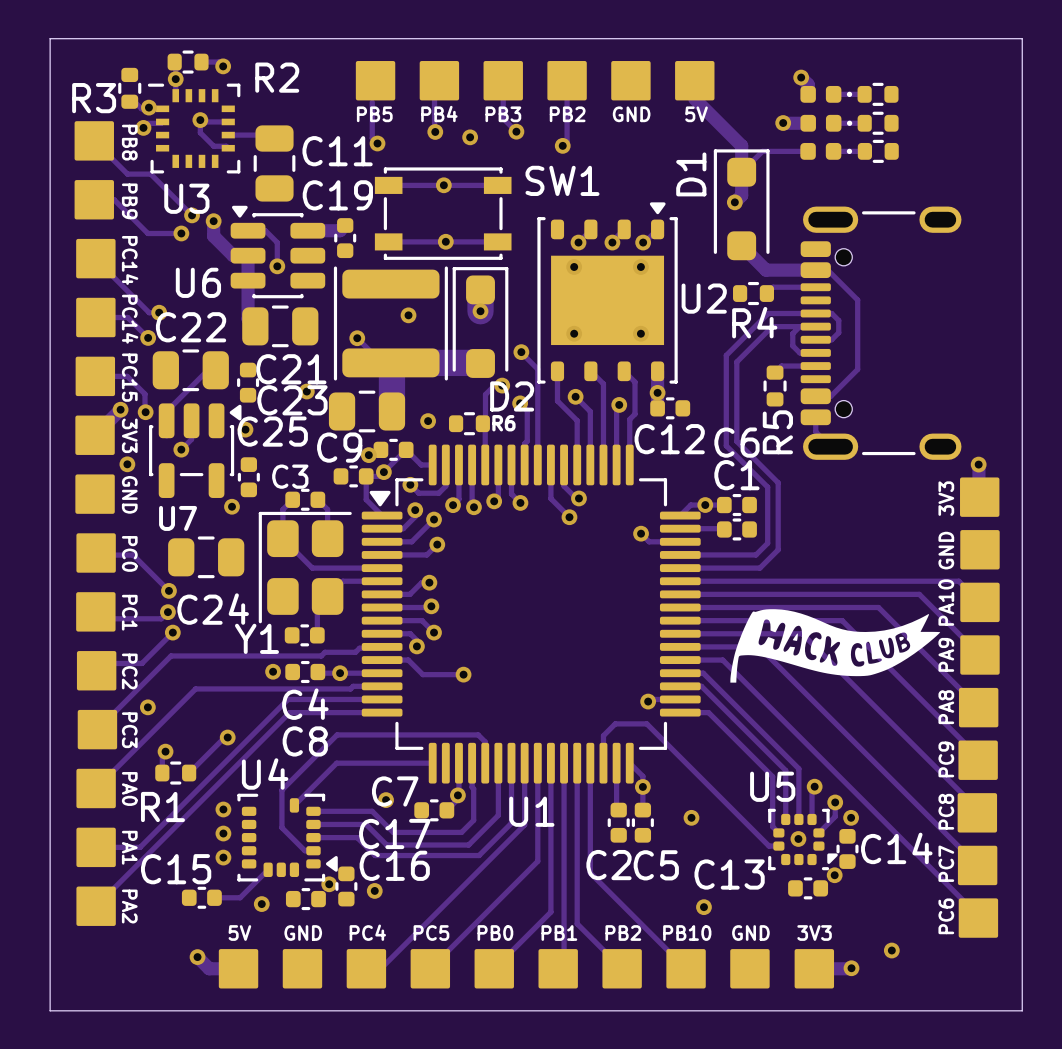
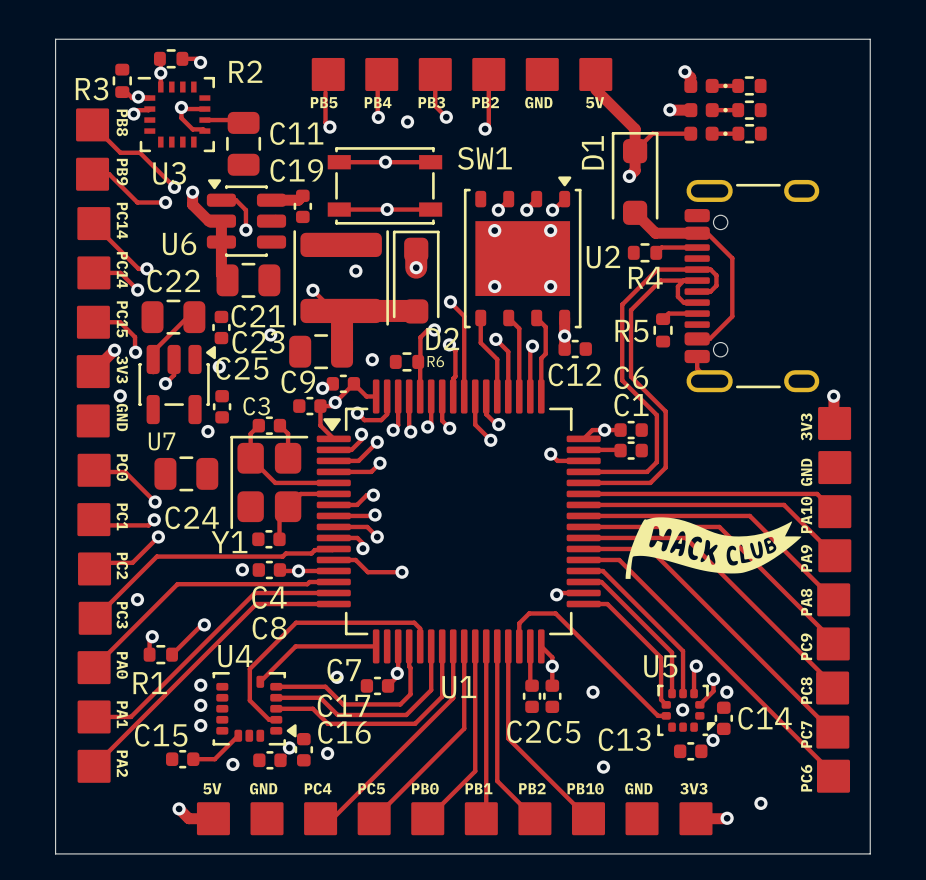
R5 name rotation: 0° (777, 432) -> 90° clockwise (631, 331)

